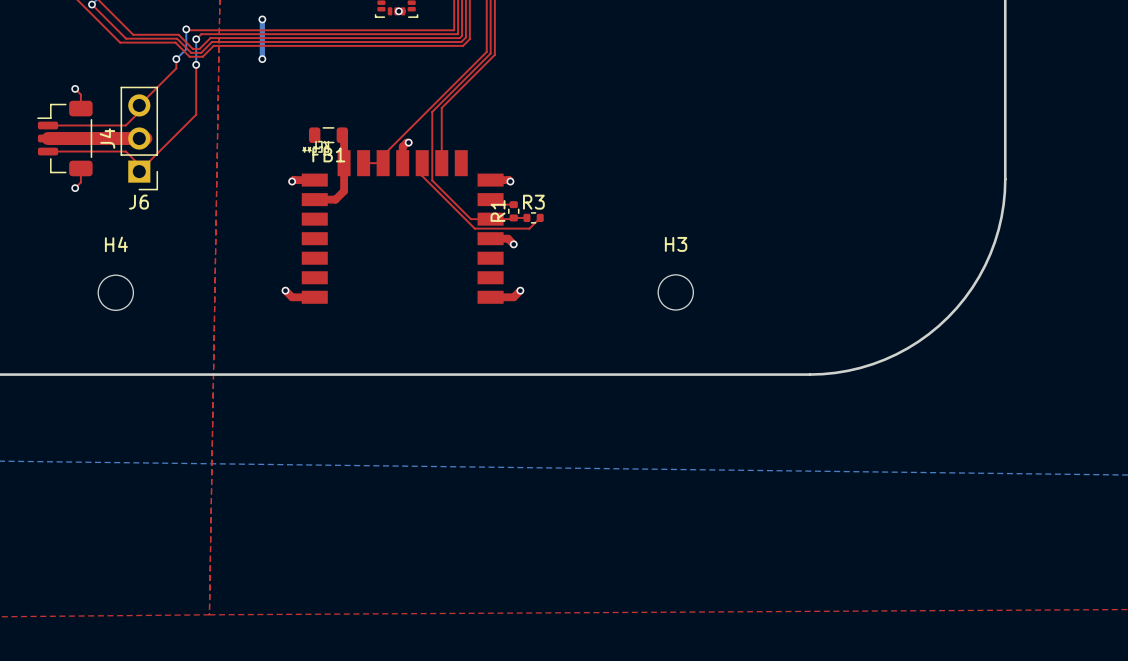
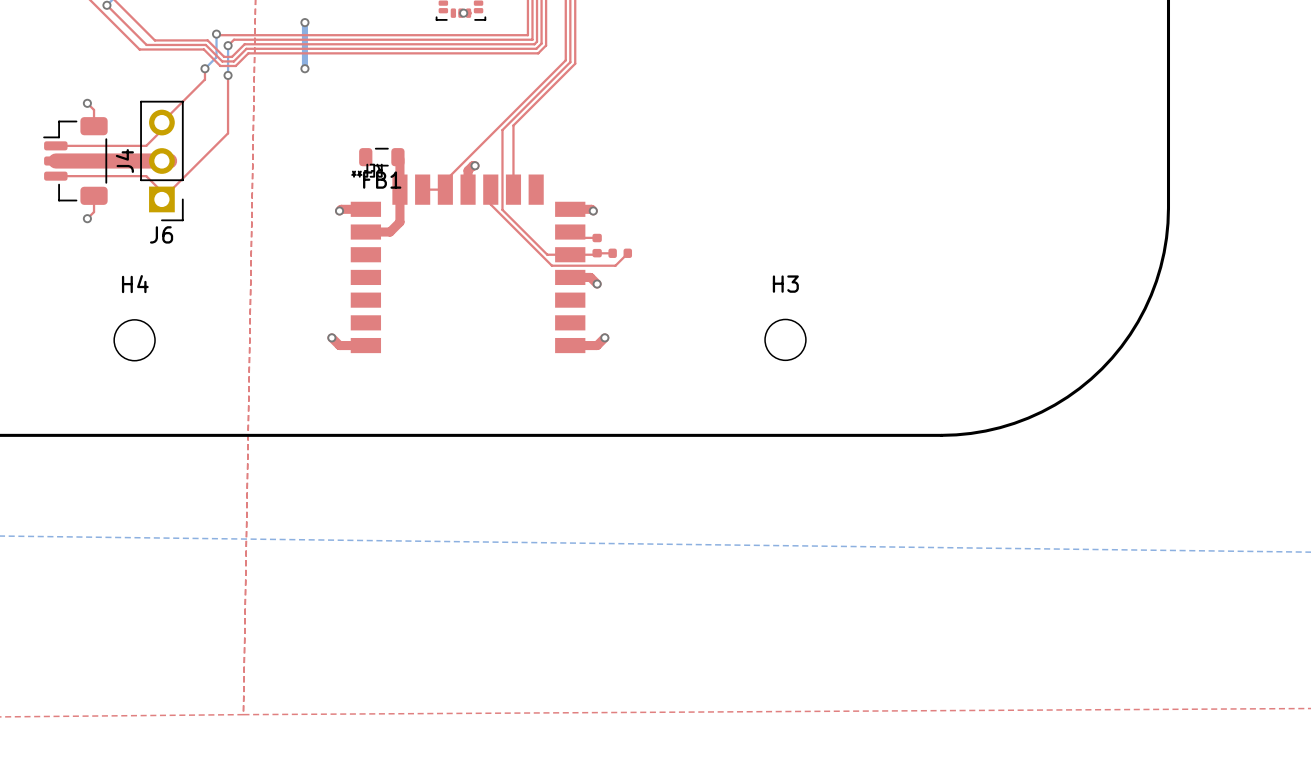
R1: (513, 211) -> none
part: none -> (597, 245)
R3: (533, 217) -> none
part: none -> (620, 253)

